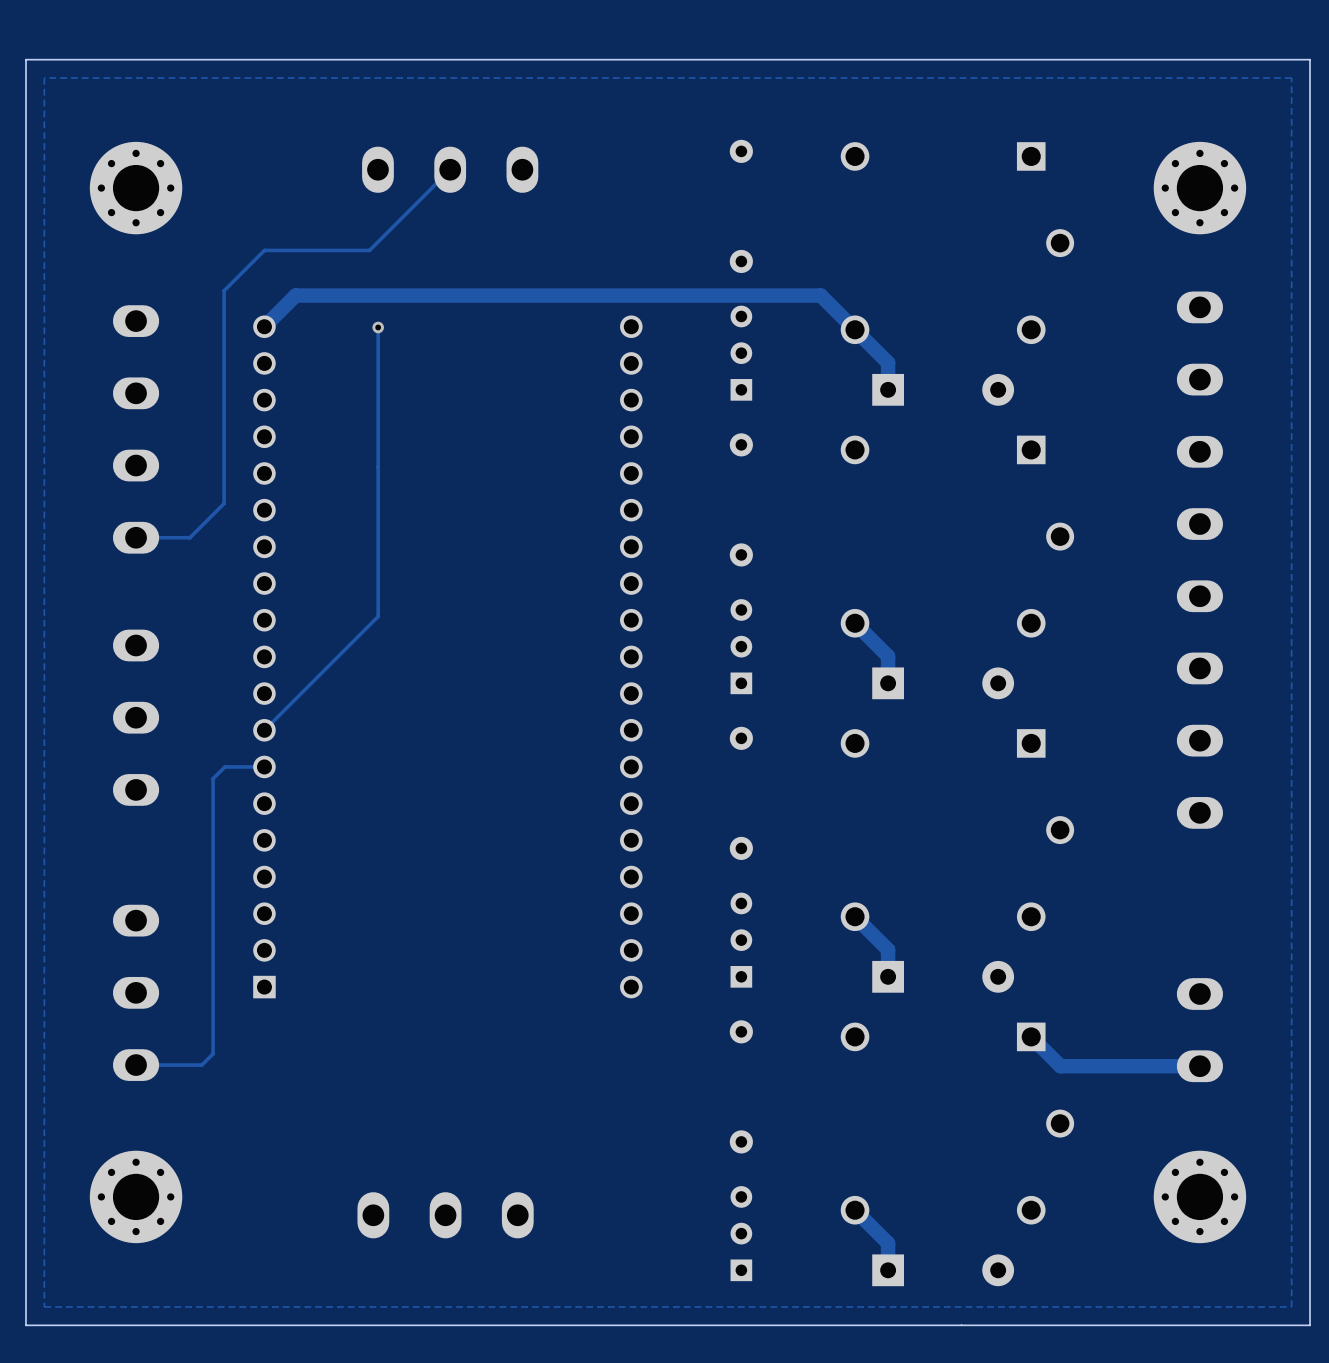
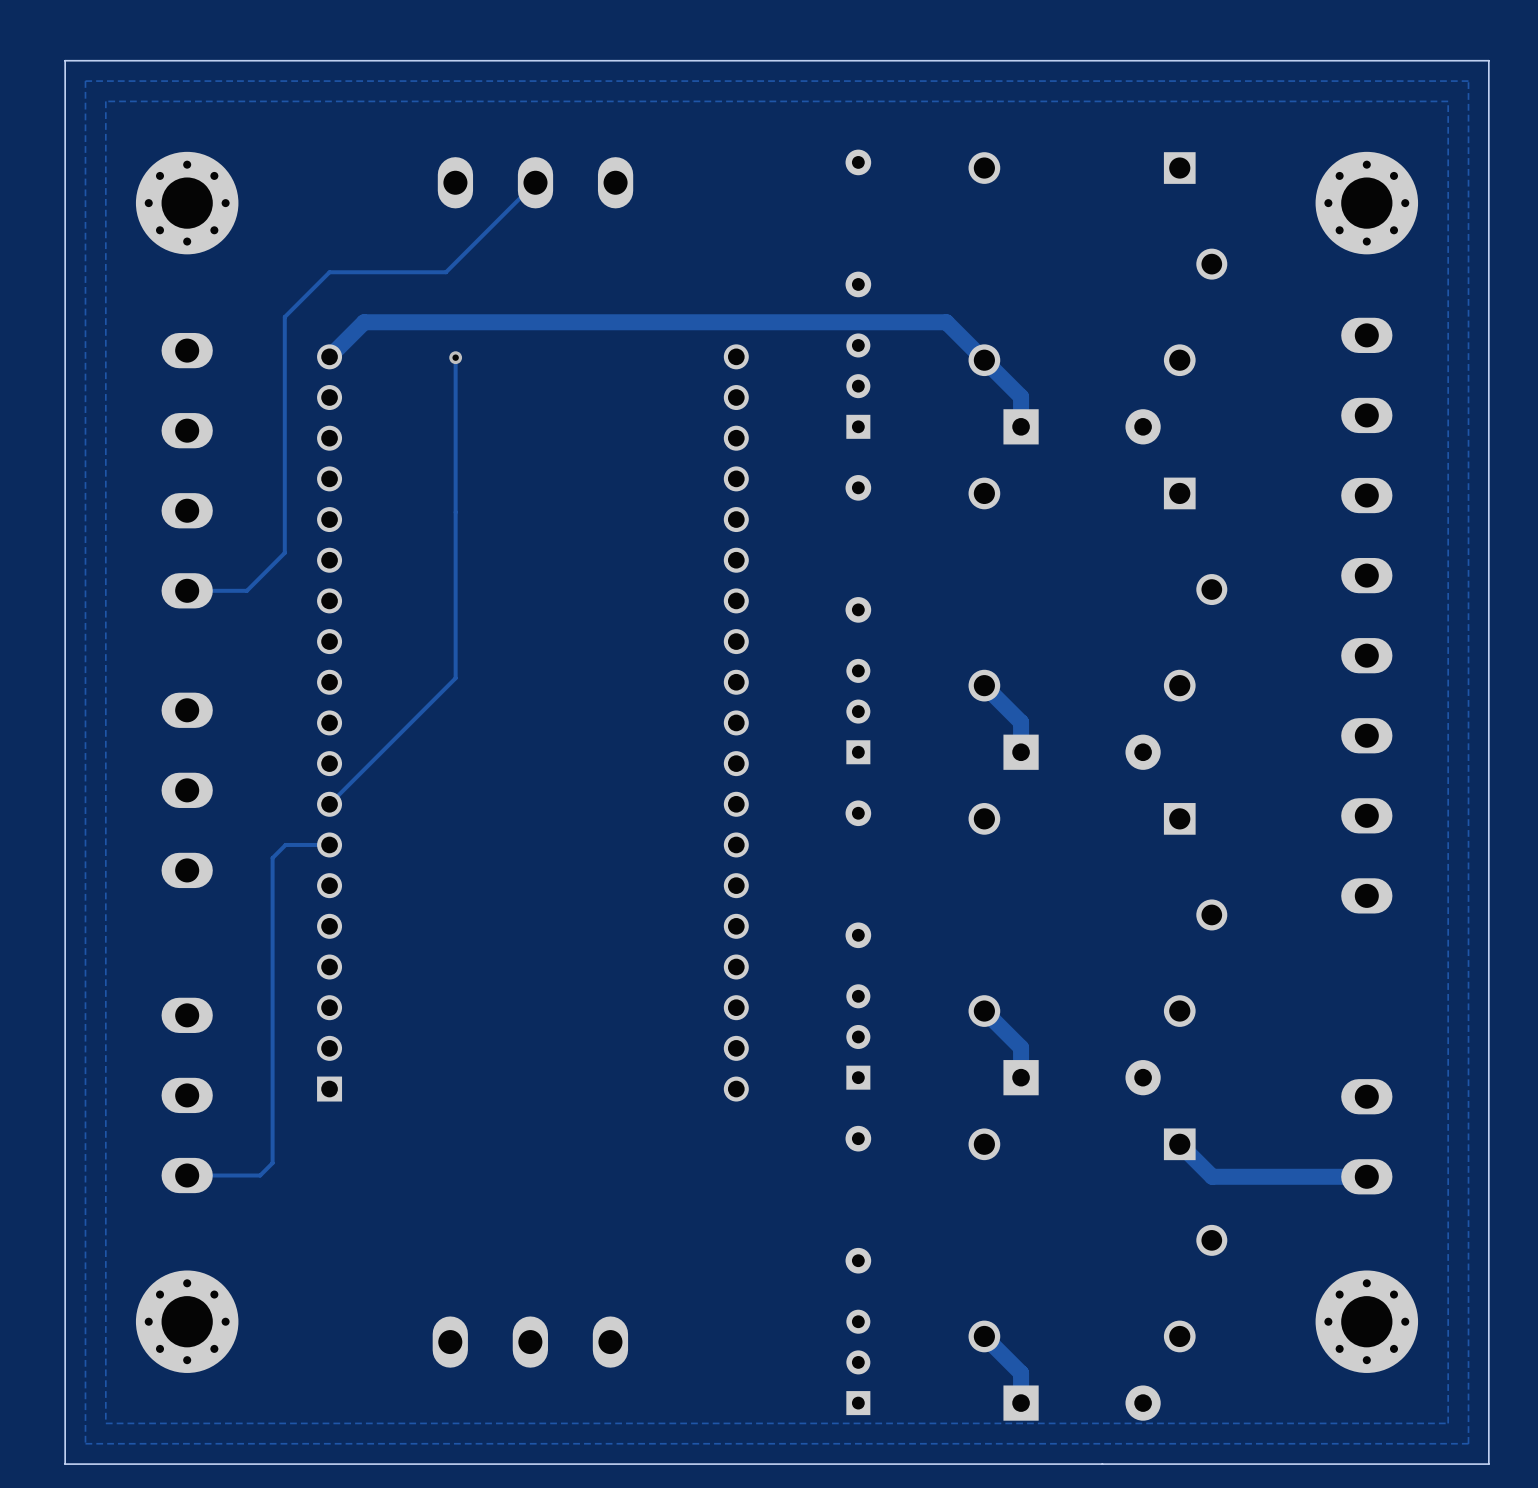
zone outline: none -> (1448, 101) (1448, 1423) (105, 1423) (105, 101) (1448, 101)

